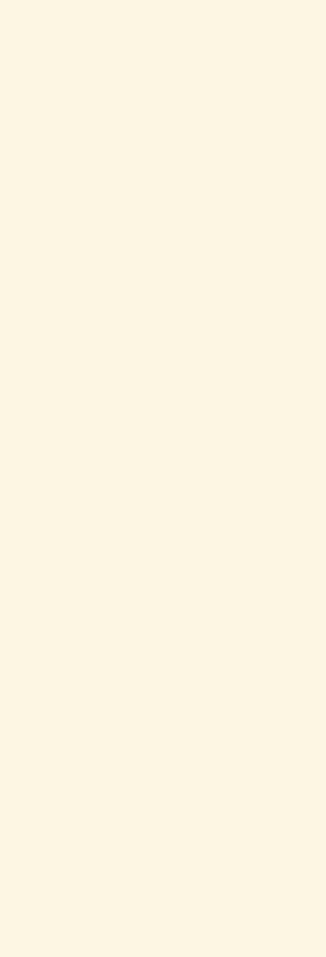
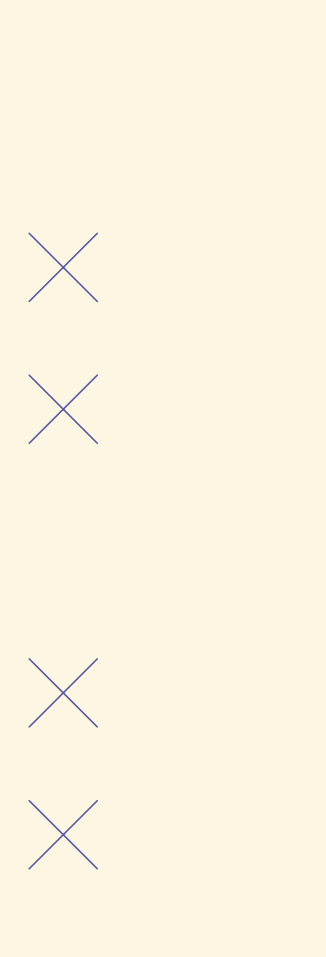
no-connect mark: none -> (63, 267)
no-connect mark: none -> (63, 409)
no-connect mark: none -> (63, 692)
no-connect mark: none -> (63, 834)

